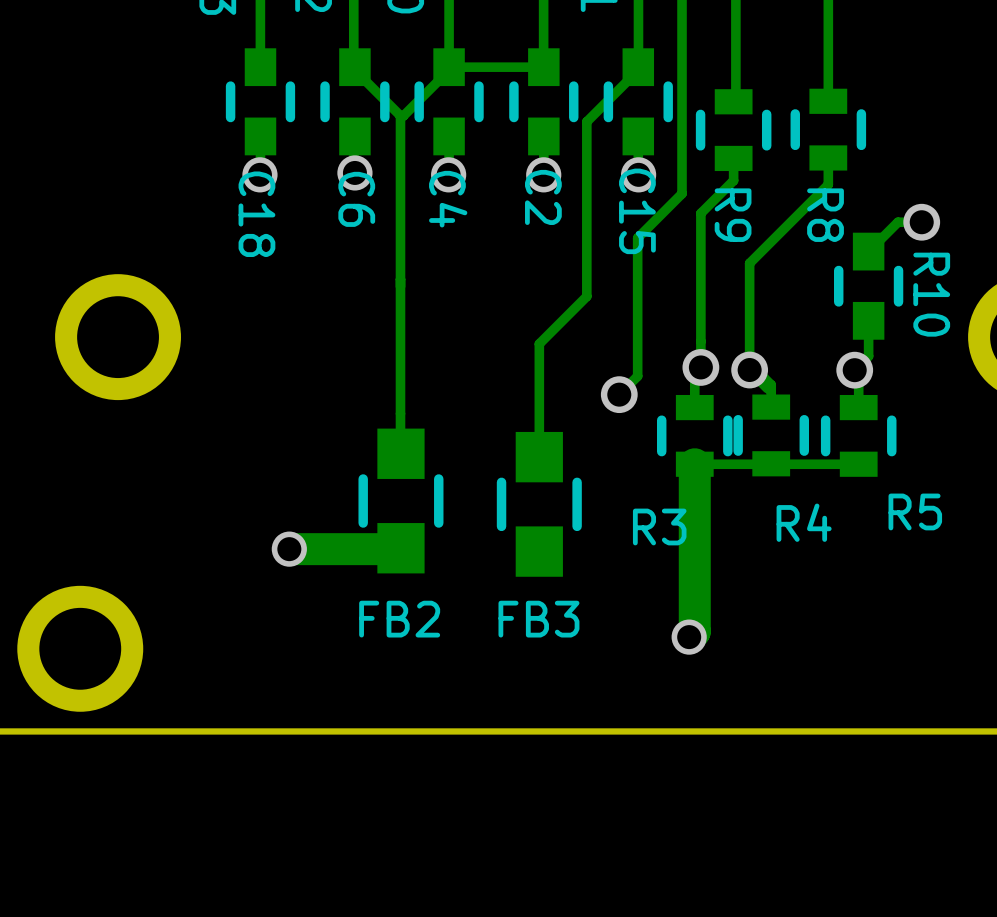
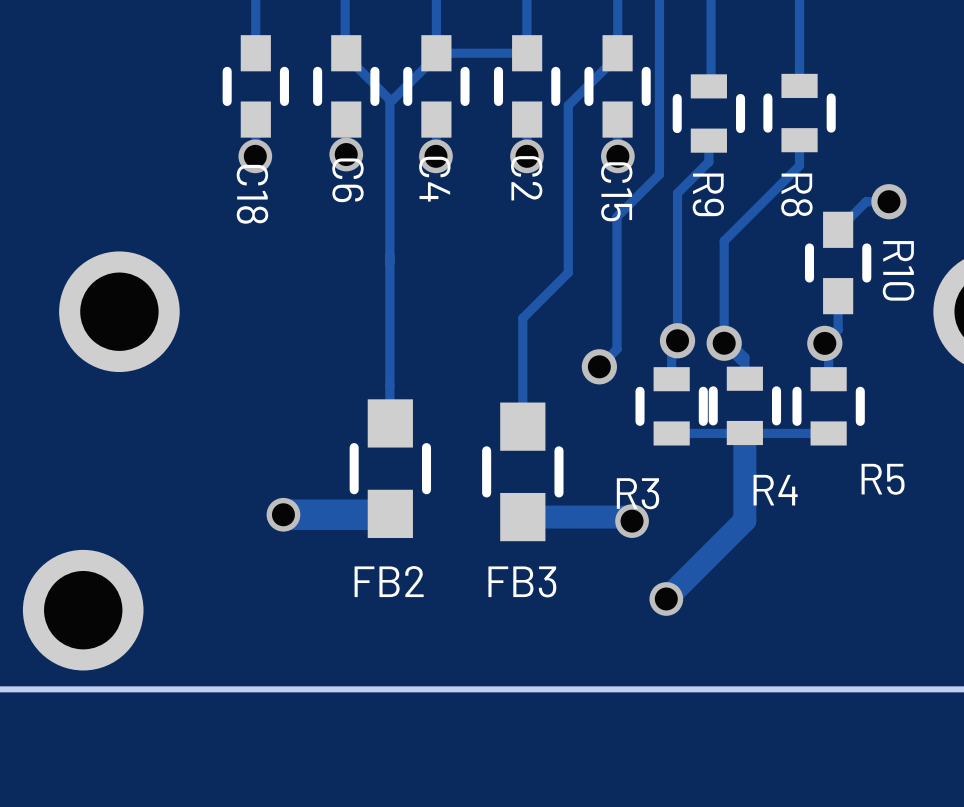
track: (694, 464) (694, 631) -> (744, 432) (744, 520) (671, 593)
track: none -> (522, 517) (628, 517) (632, 521)
via: none -> (632, 521)

